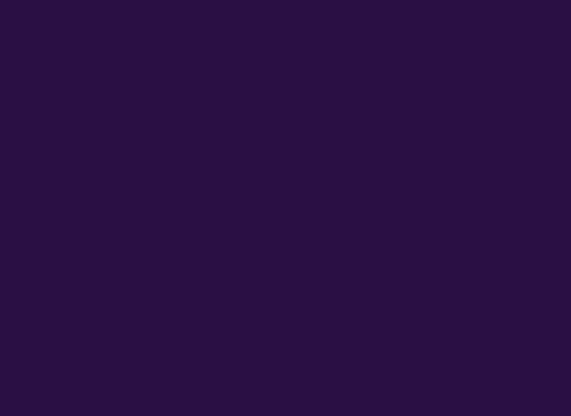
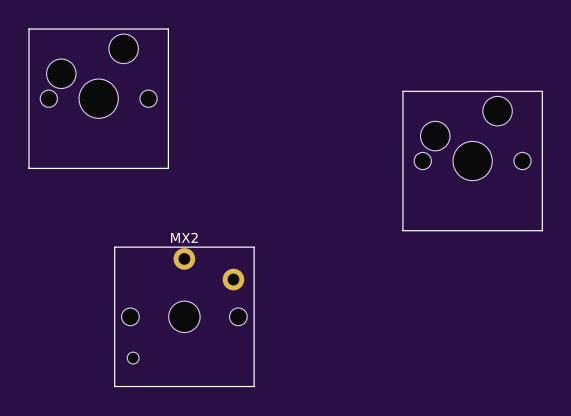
part: none -> (98, 98)
part: none -> (472, 161)
MX2: none -> (184, 316)

